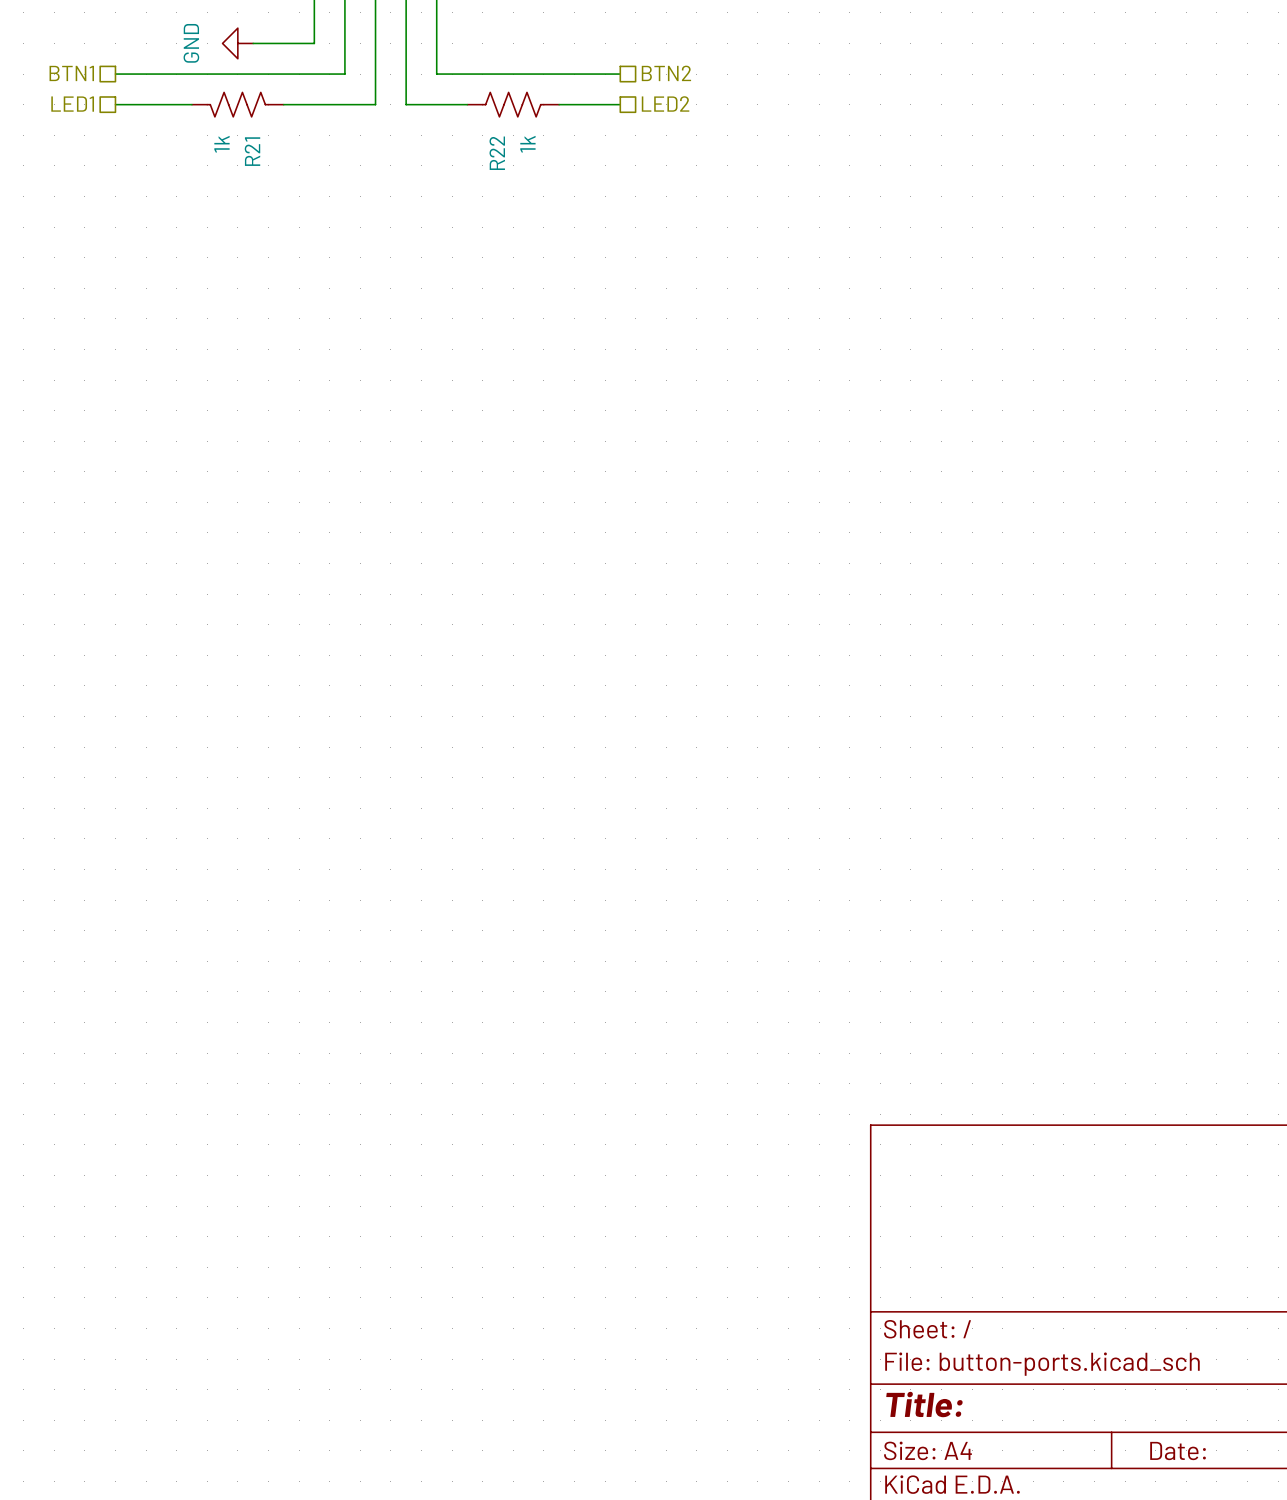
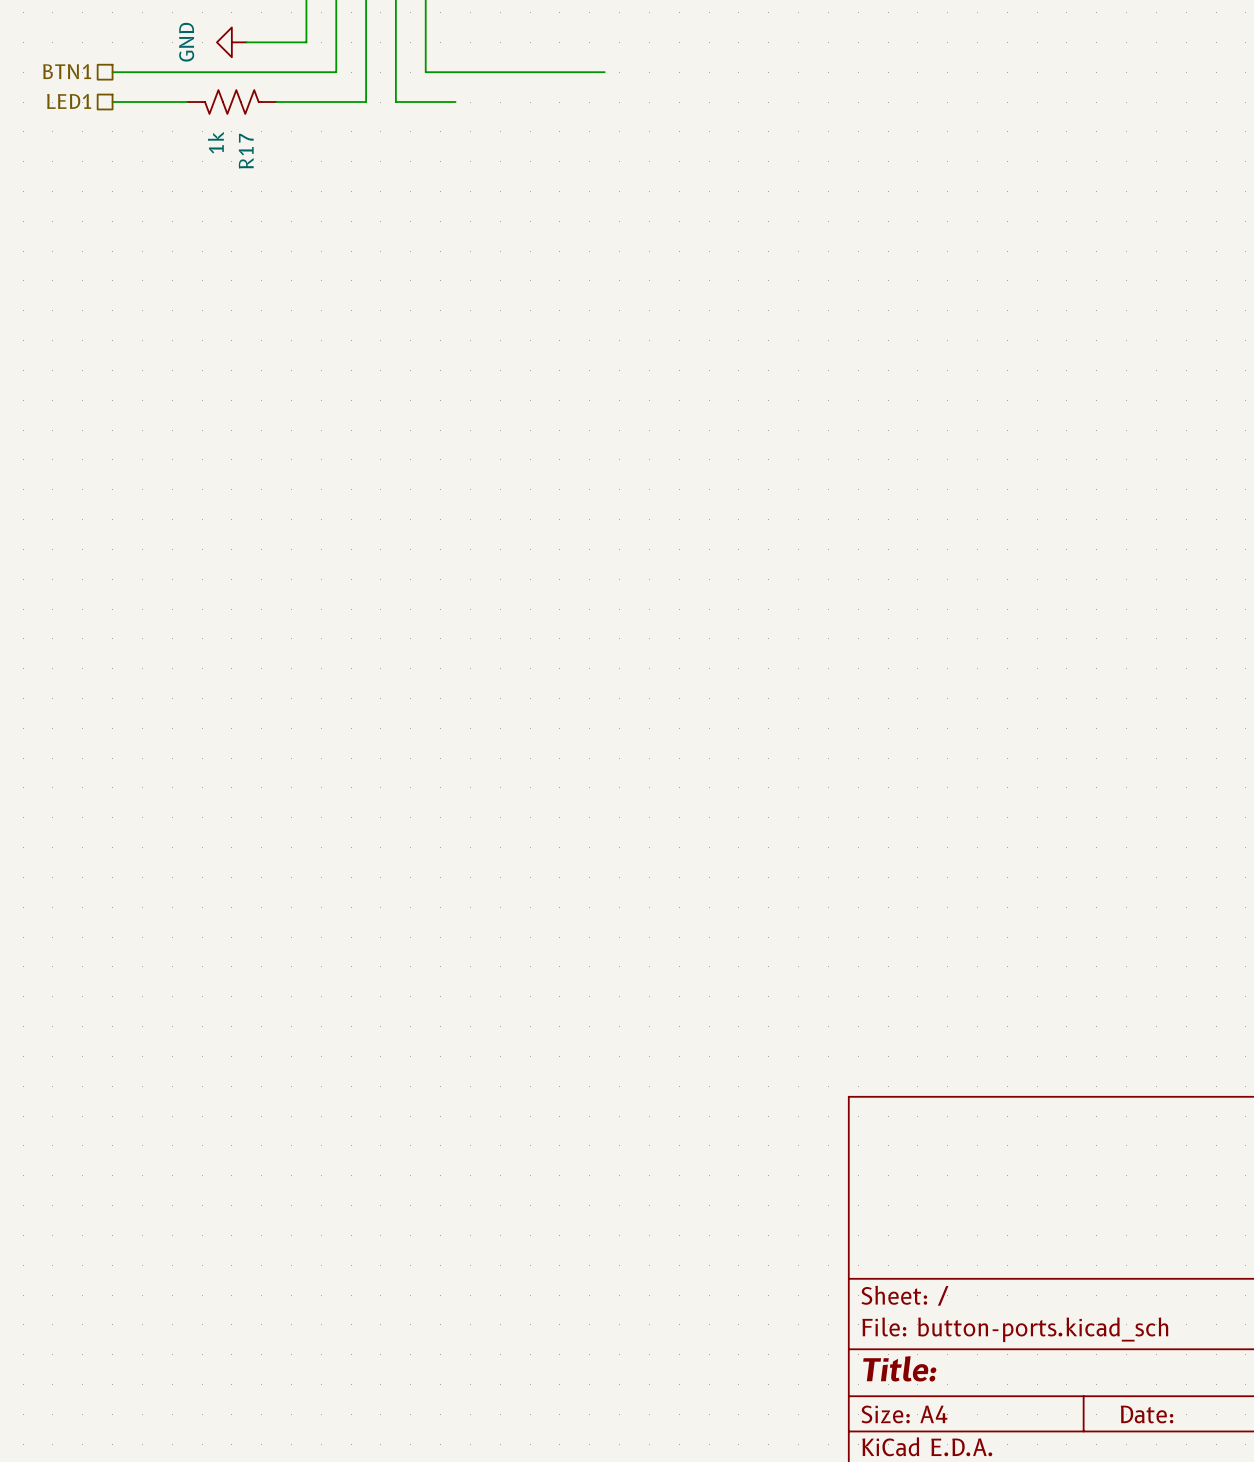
hierarchical label: BTN2 (666, 73) -> none
hierarchical label: LED2 (665, 103) -> none
R22: 1k (513, 104) -> none
wire: (559, 104) (620, 104) -> none
R21 name: R21 (252, 151) -> R17 (246, 151)

